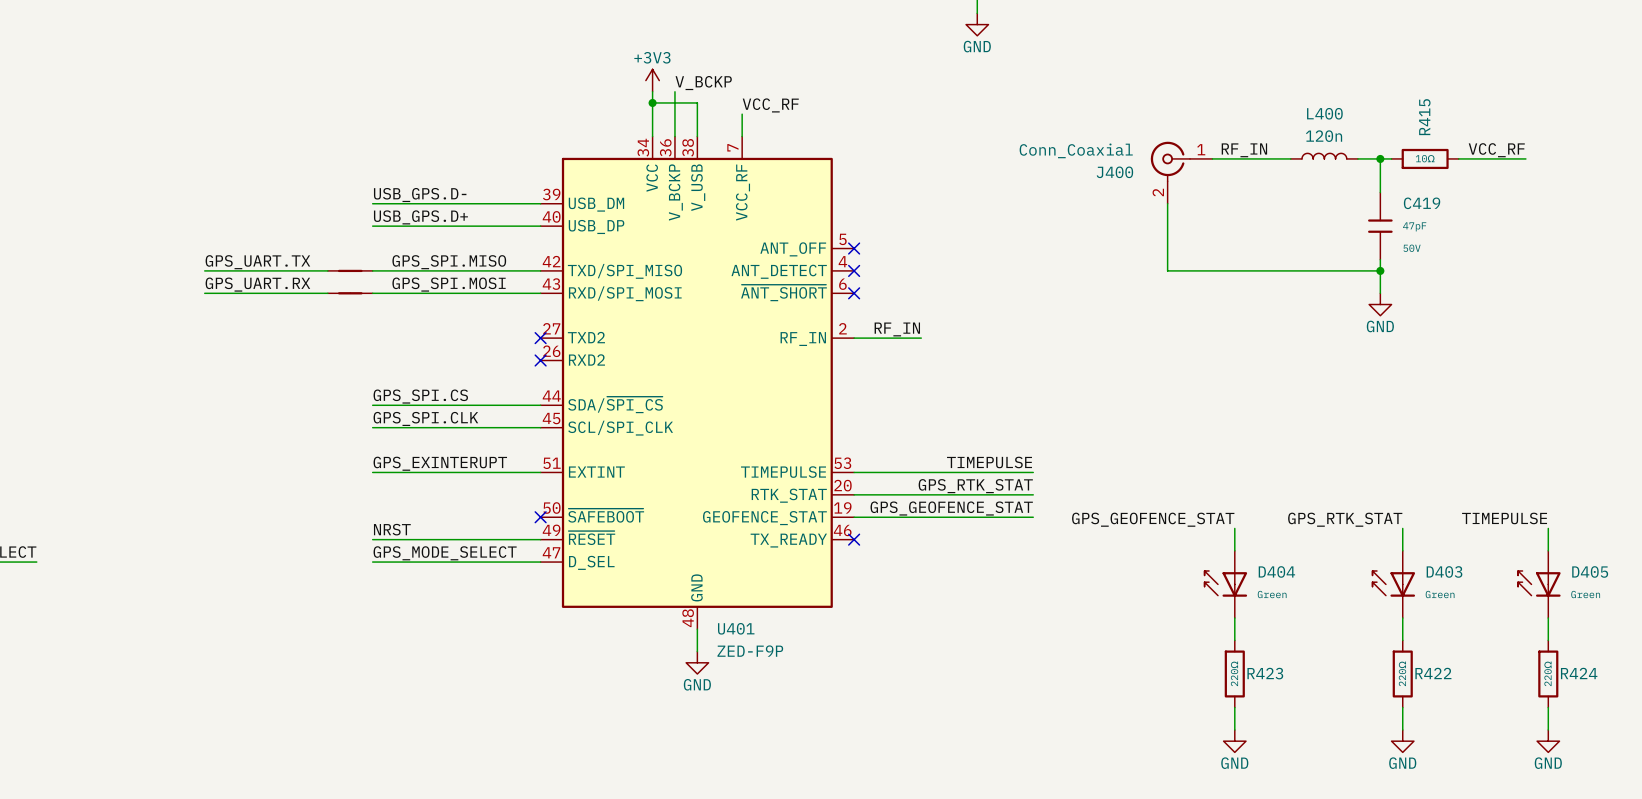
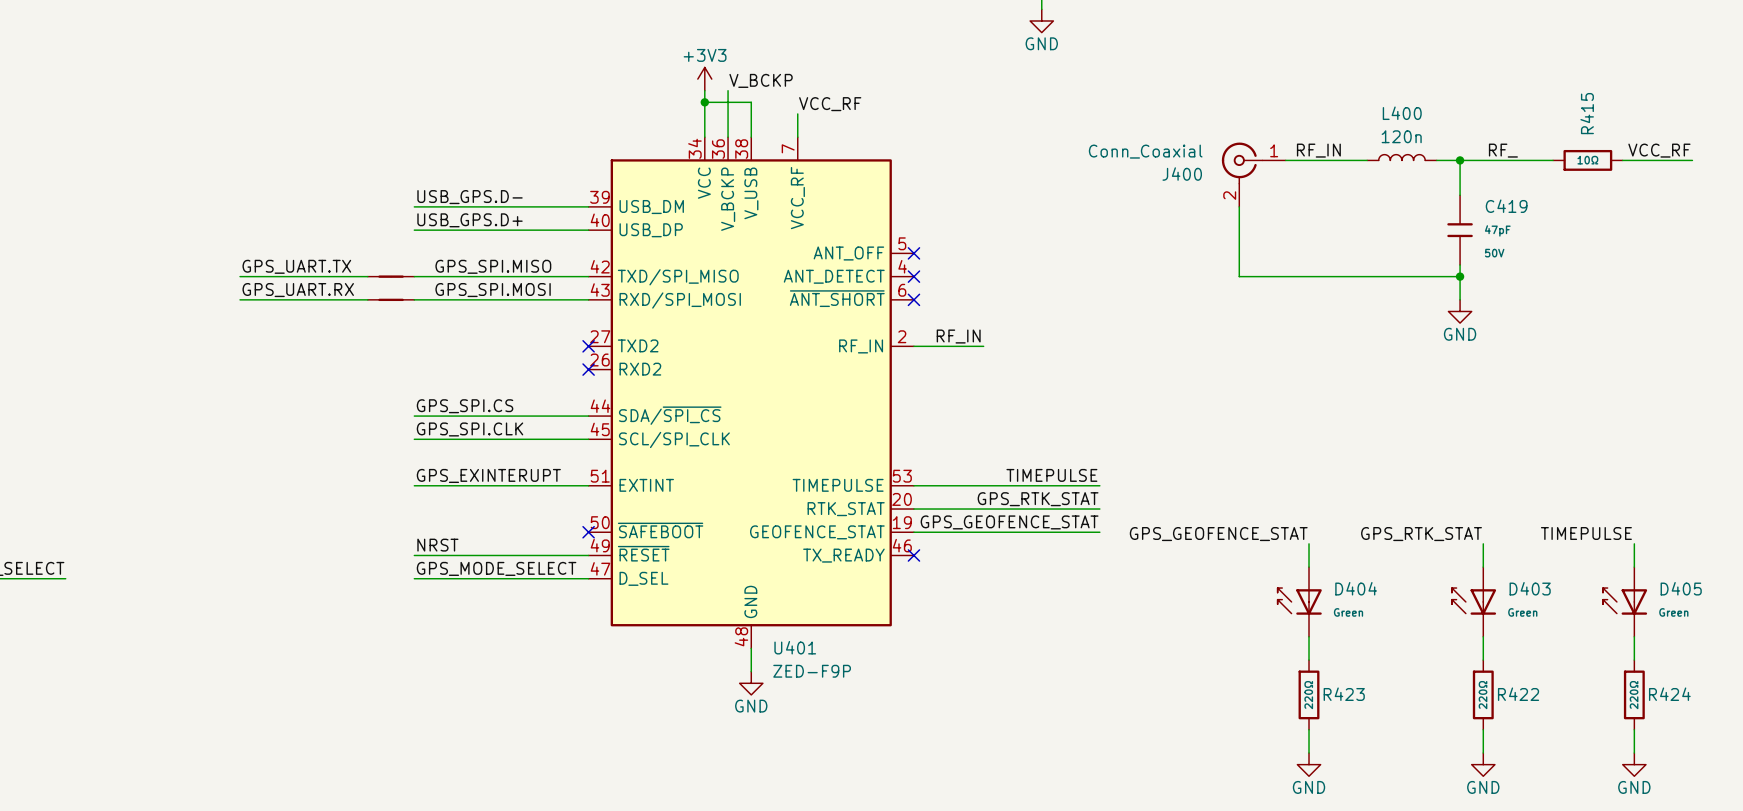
label: none -> RF_ (1503, 150)
label position: VCC_RF (1496, 150) -> VCC_RF (1659, 150)
wire: none -> (1471, 160) (1541, 160)
R415 position: (1425, 158) -> (1587, 160)
wire: (1469, 158) (1525, 158) -> none
wire: none -> (1622, 160) (1692, 160)

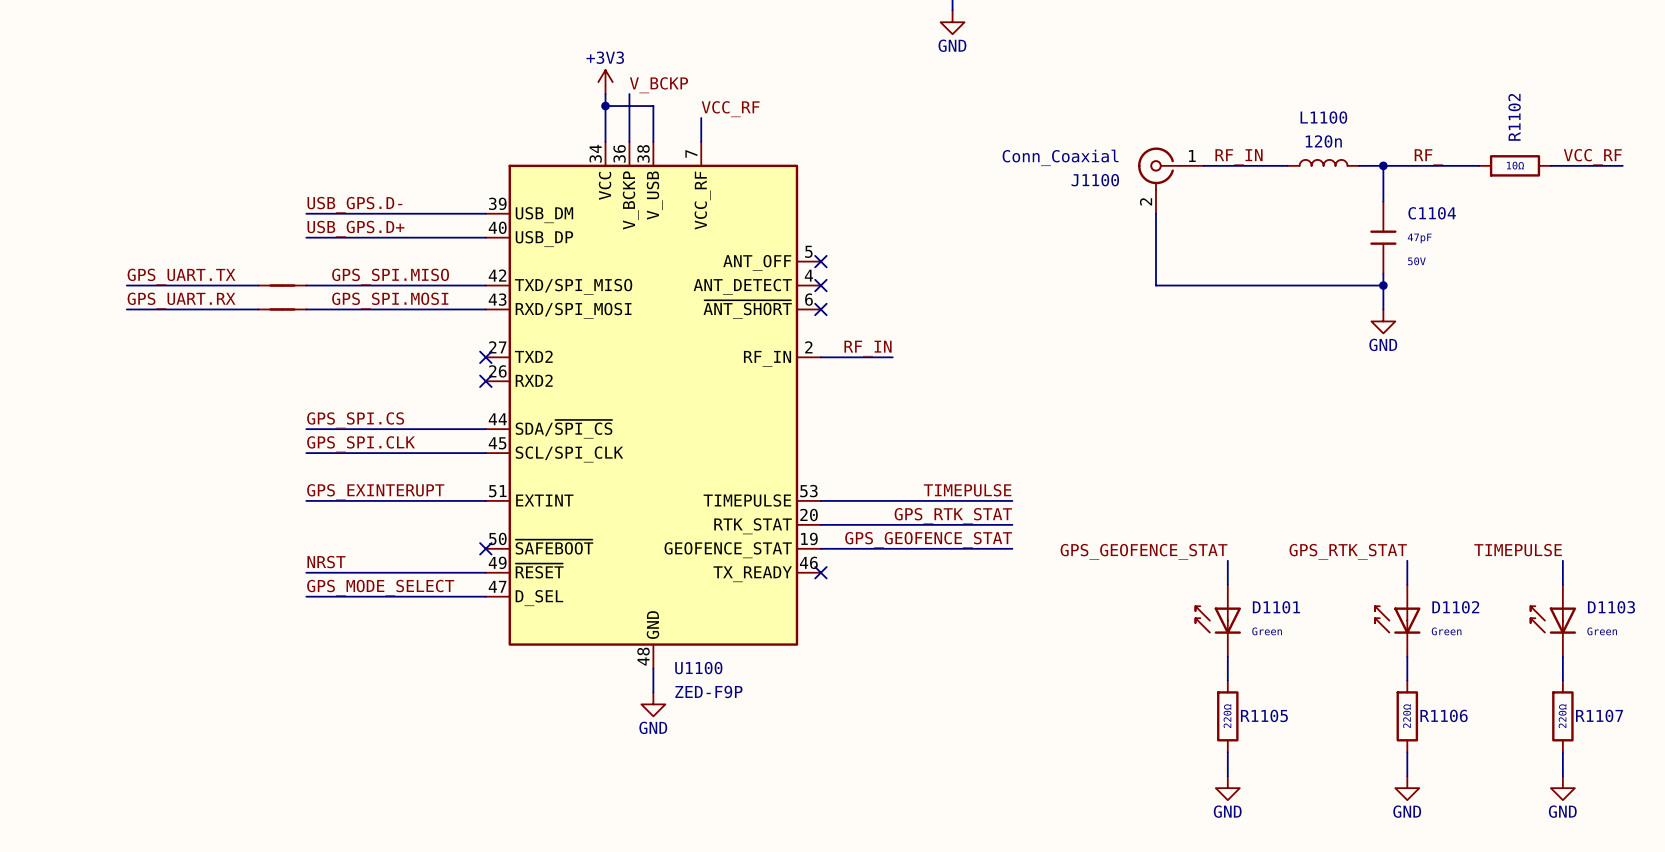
L400 name: L400 (1402, 113) -> L1100 (1323, 117)
R415 name: R415 (1587, 113) -> R1102 (1514, 117)
J400 name: J400 (1182, 174) -> J1100 (1095, 180)
C419 name: C419 (1506, 206) -> C1104 (1432, 213)
D404 name: D404 (1356, 588) -> D1101 (1276, 607)
D403 name: D403 (1530, 588) -> D1102 (1455, 607)
D405 name: D405 (1681, 588) -> D1103 (1611, 607)
U401 name: U401 (795, 647) -> U1100 (698, 668)
R423 name: R423 (1344, 694) -> R1105 (1264, 715)
R422 name: R422 (1518, 694) -> R1106 (1444, 715)
R424 name: R424 (1669, 694) -> R1107 (1599, 715)

